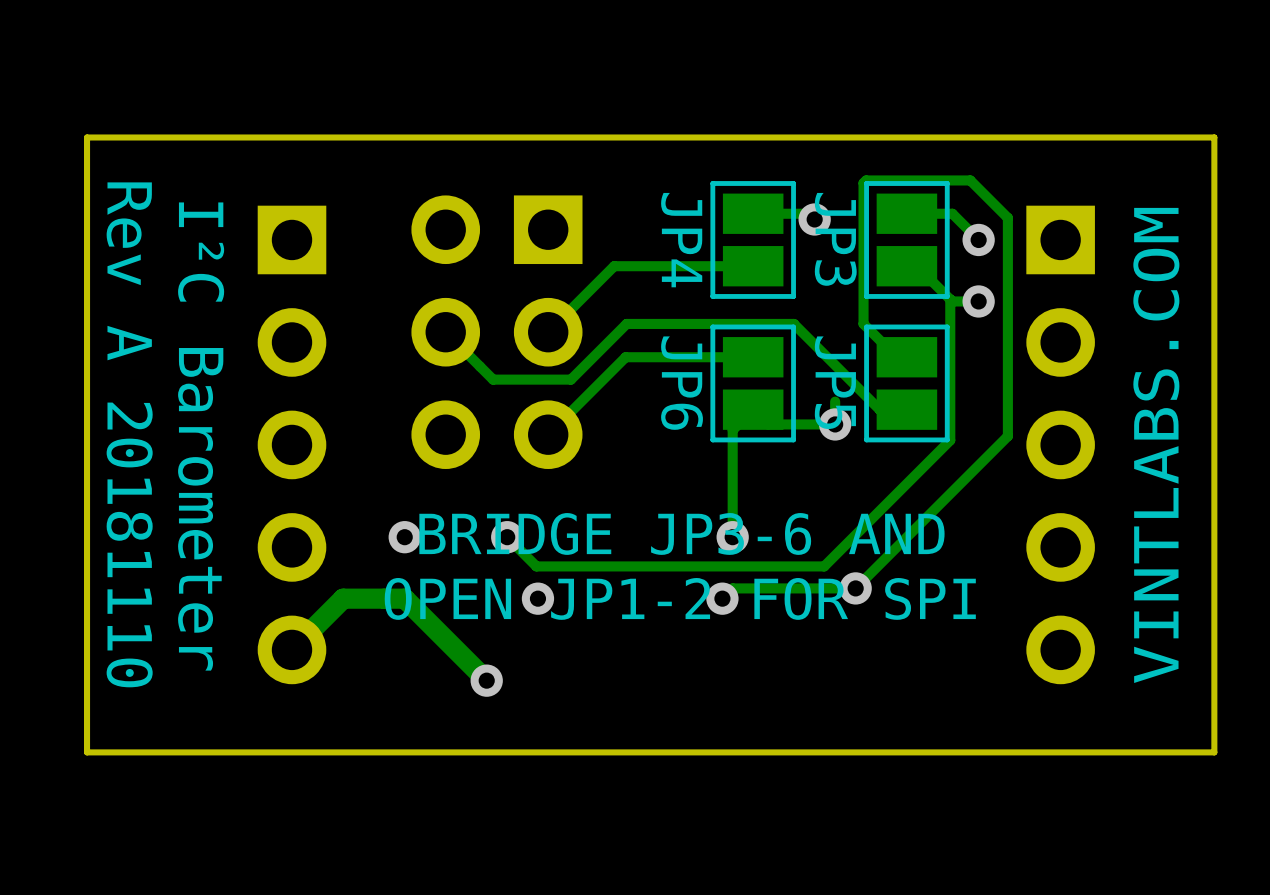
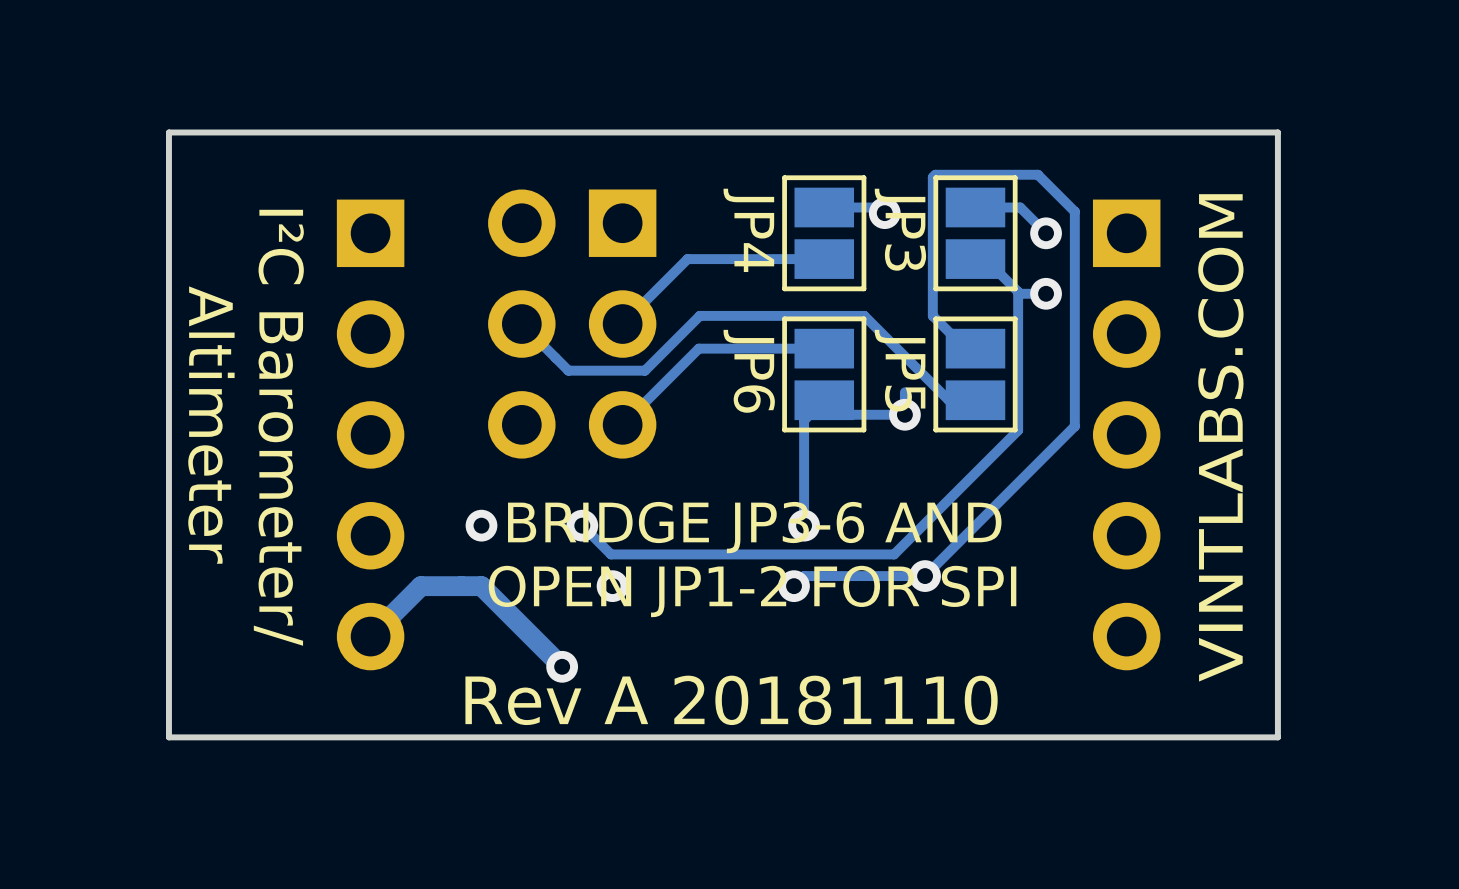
text: Rev A 20181110 (129, 434) -> Altimeter (211, 425)
text: I²C Barometer (201, 436) -> I²C Barometer/ (278, 427)
text: none -> Rev A 20181110 (731, 700)

